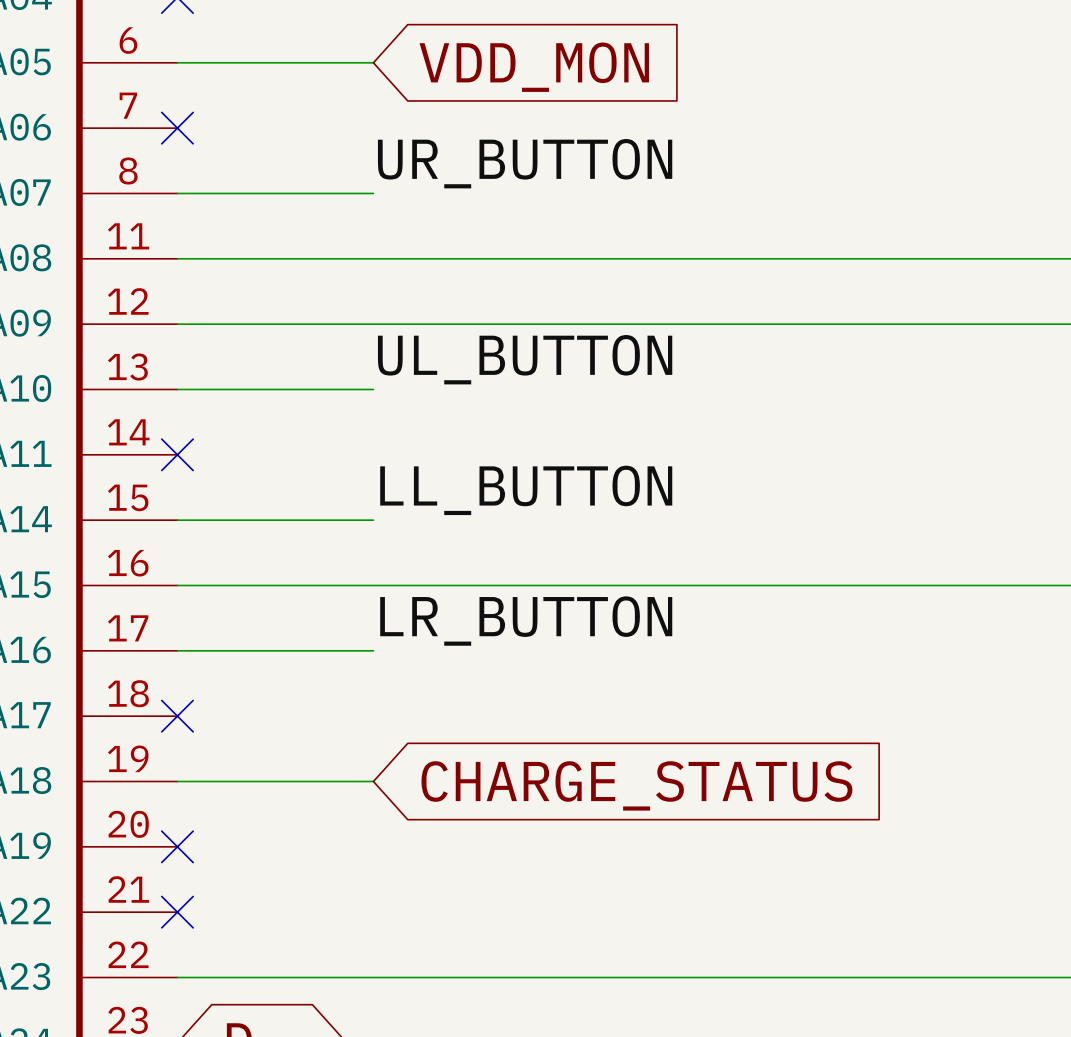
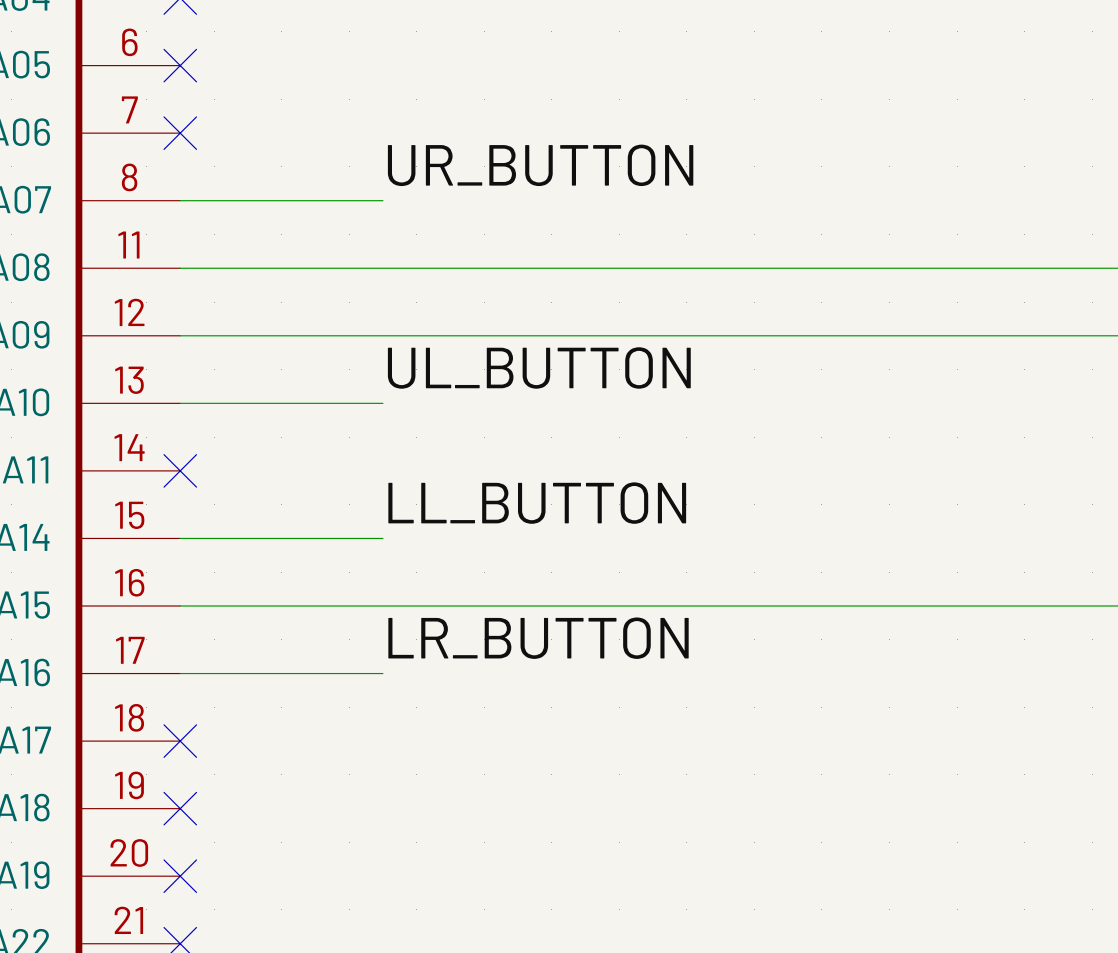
wire: (177, 62) (373, 62) -> none
no-connect mark: none -> (180, 65)
global label: VDD_MON (534, 67) -> none
wire: (177, 781) (373, 781) -> none
no-connect mark: none -> (180, 808)
global label: CHARGE_STATUS (636, 785) -> none

